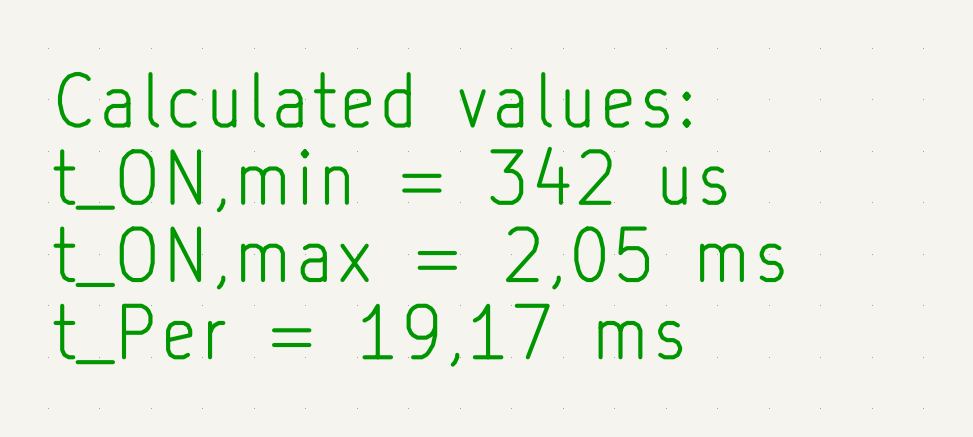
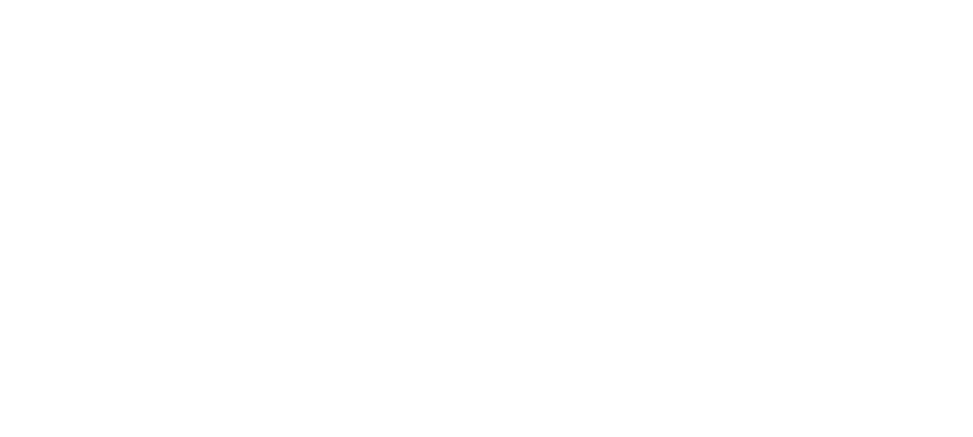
text: Calculated values: (374, 99) -> none
text: t_ON,min = 342 us (389, 179) -> none
text: t_ON,max = 2,05 ms (418, 257) -> none
text: t_Per = 19,17 ms (367, 335) -> none

